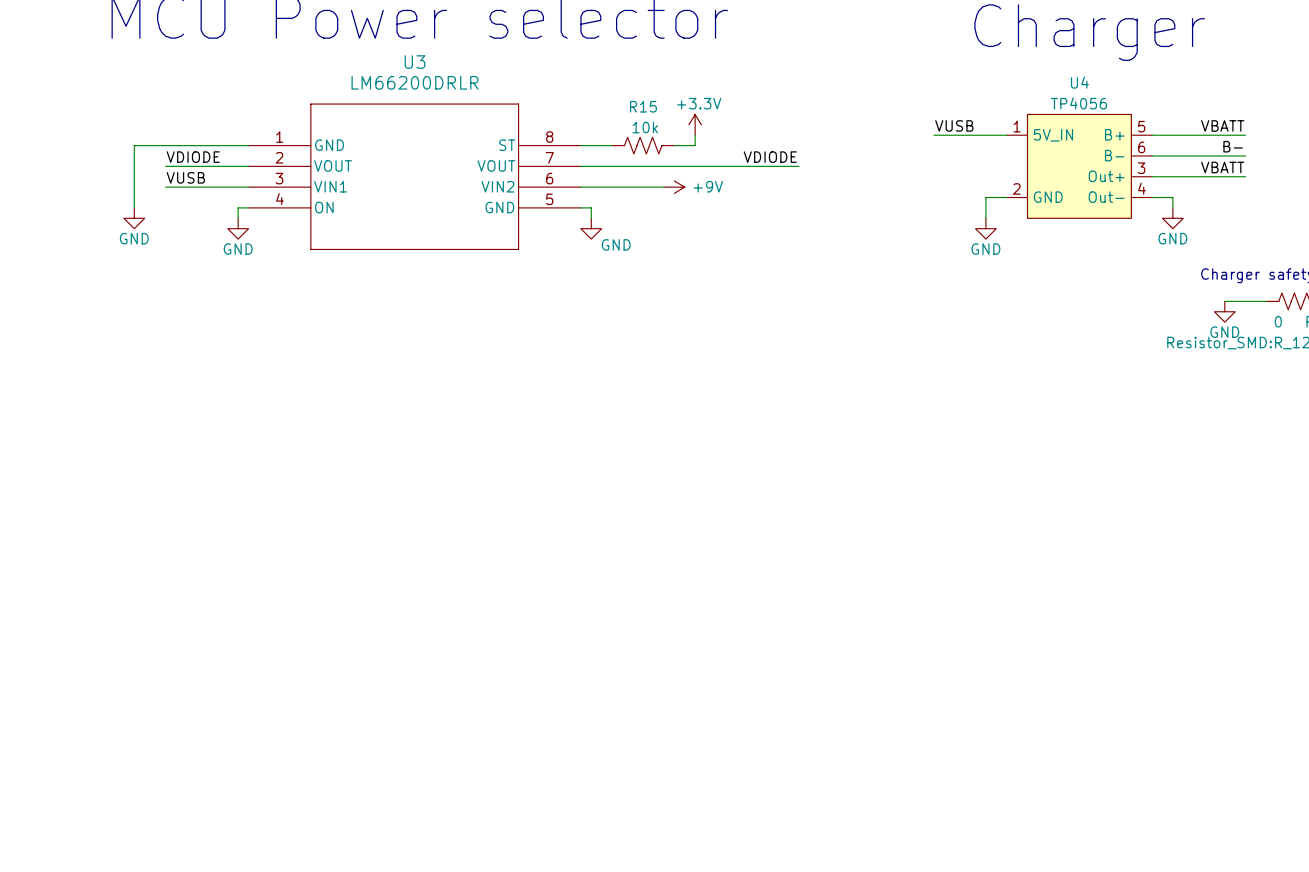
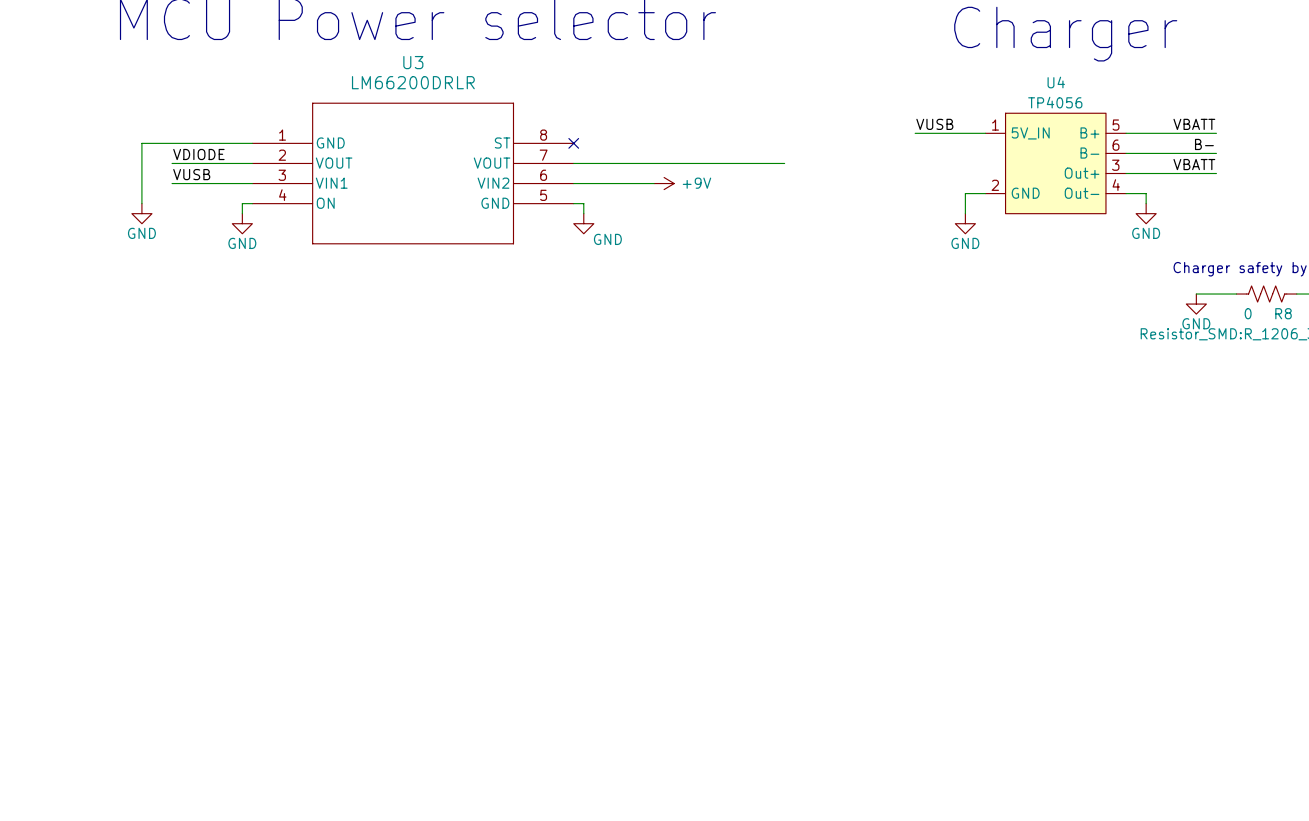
power symbol: +3.3V (695, 124) -> none
wire: (695, 135) (695, 145) (674, 145) -> none
wire: (580, 145) (612, 145) -> none
no-connect mark: none -> (573, 143)
R15: 10k (643, 145) -> none
label: VDIODE (770, 157) -> none

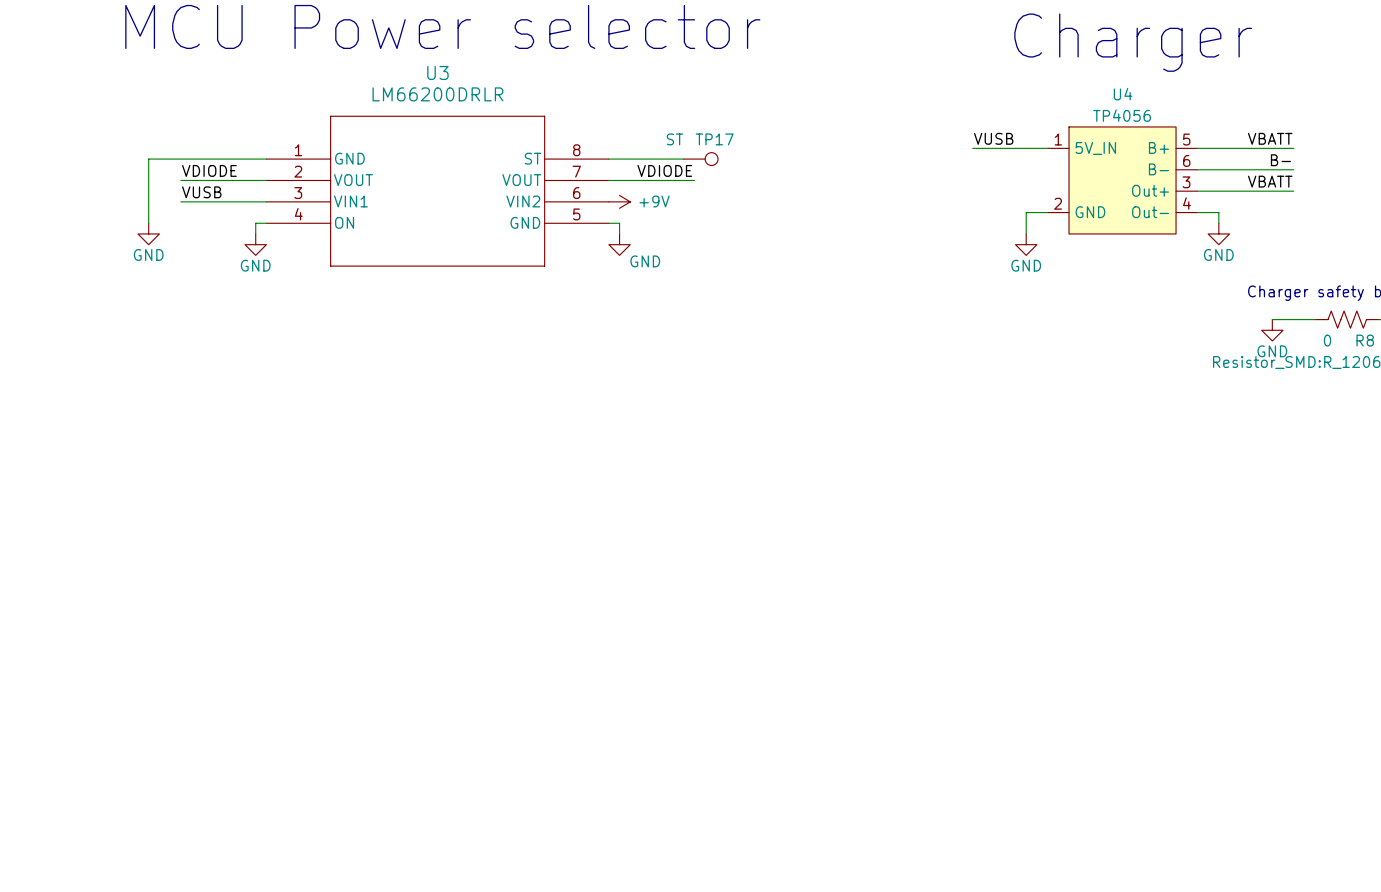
wire: none -> (608, 159) (683, 159)
no-connect mark: (573, 143) -> none
TP17: none -> ST (700, 159)
label: none -> VDIODE (664, 170)
wire: (654, 163) (784, 163) -> none
wire: (573, 183) (654, 183) -> none
power symbol position: +9V (664, 183) -> +9V (619, 201)

